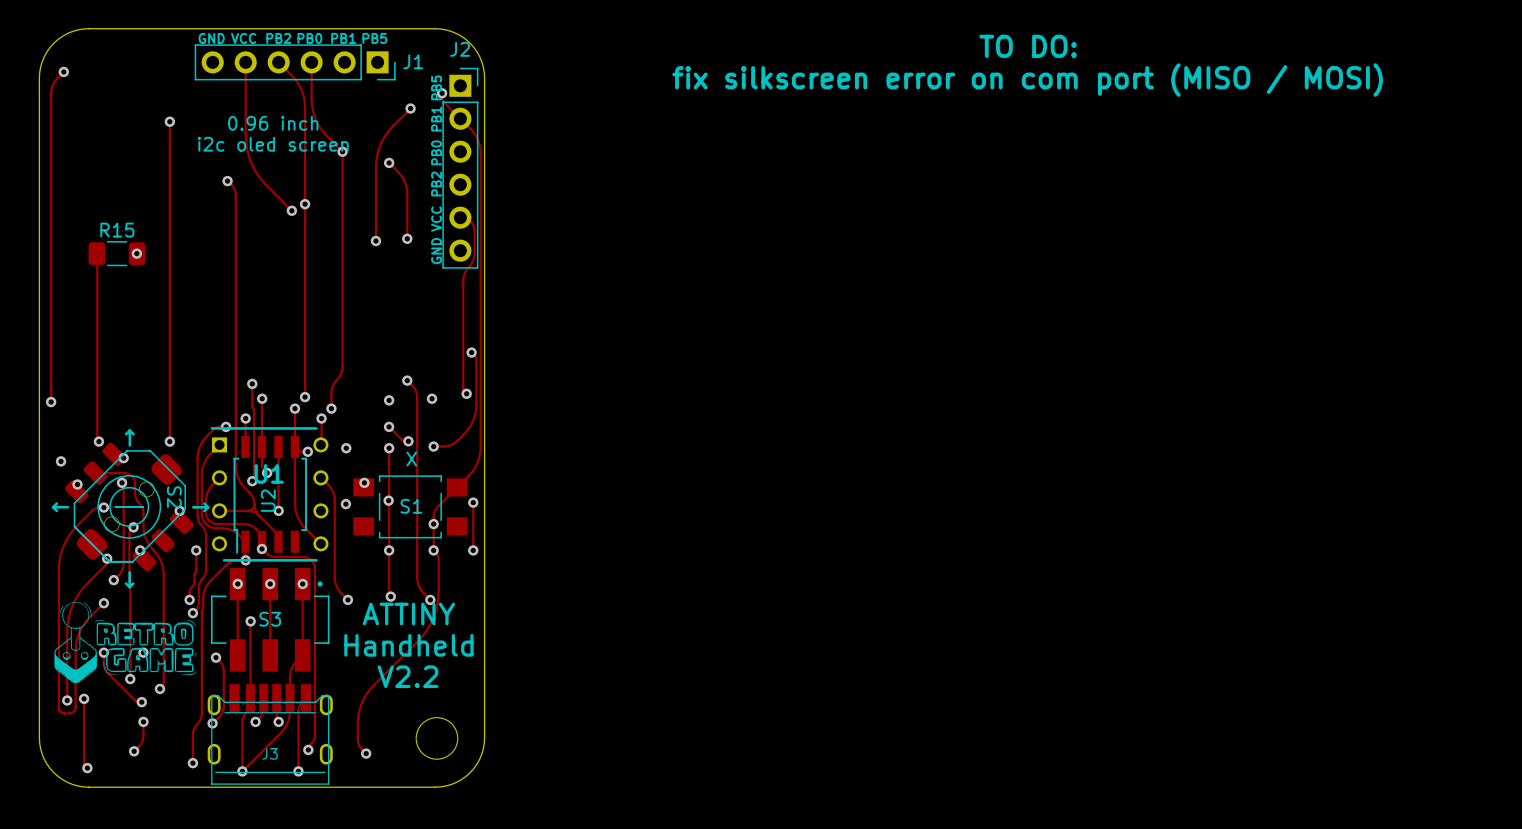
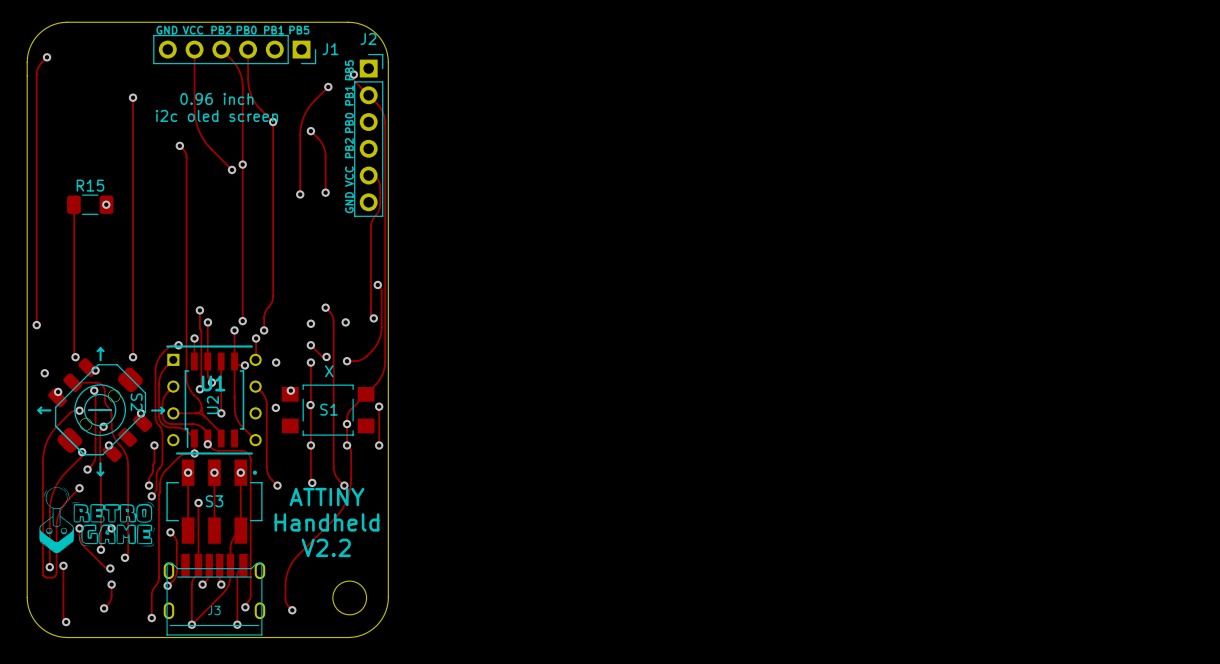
text: TO DO: (1028, 46) -> none
text: fix silkscreen error on com port (MISO / MOSI) (1027, 80) -> none

